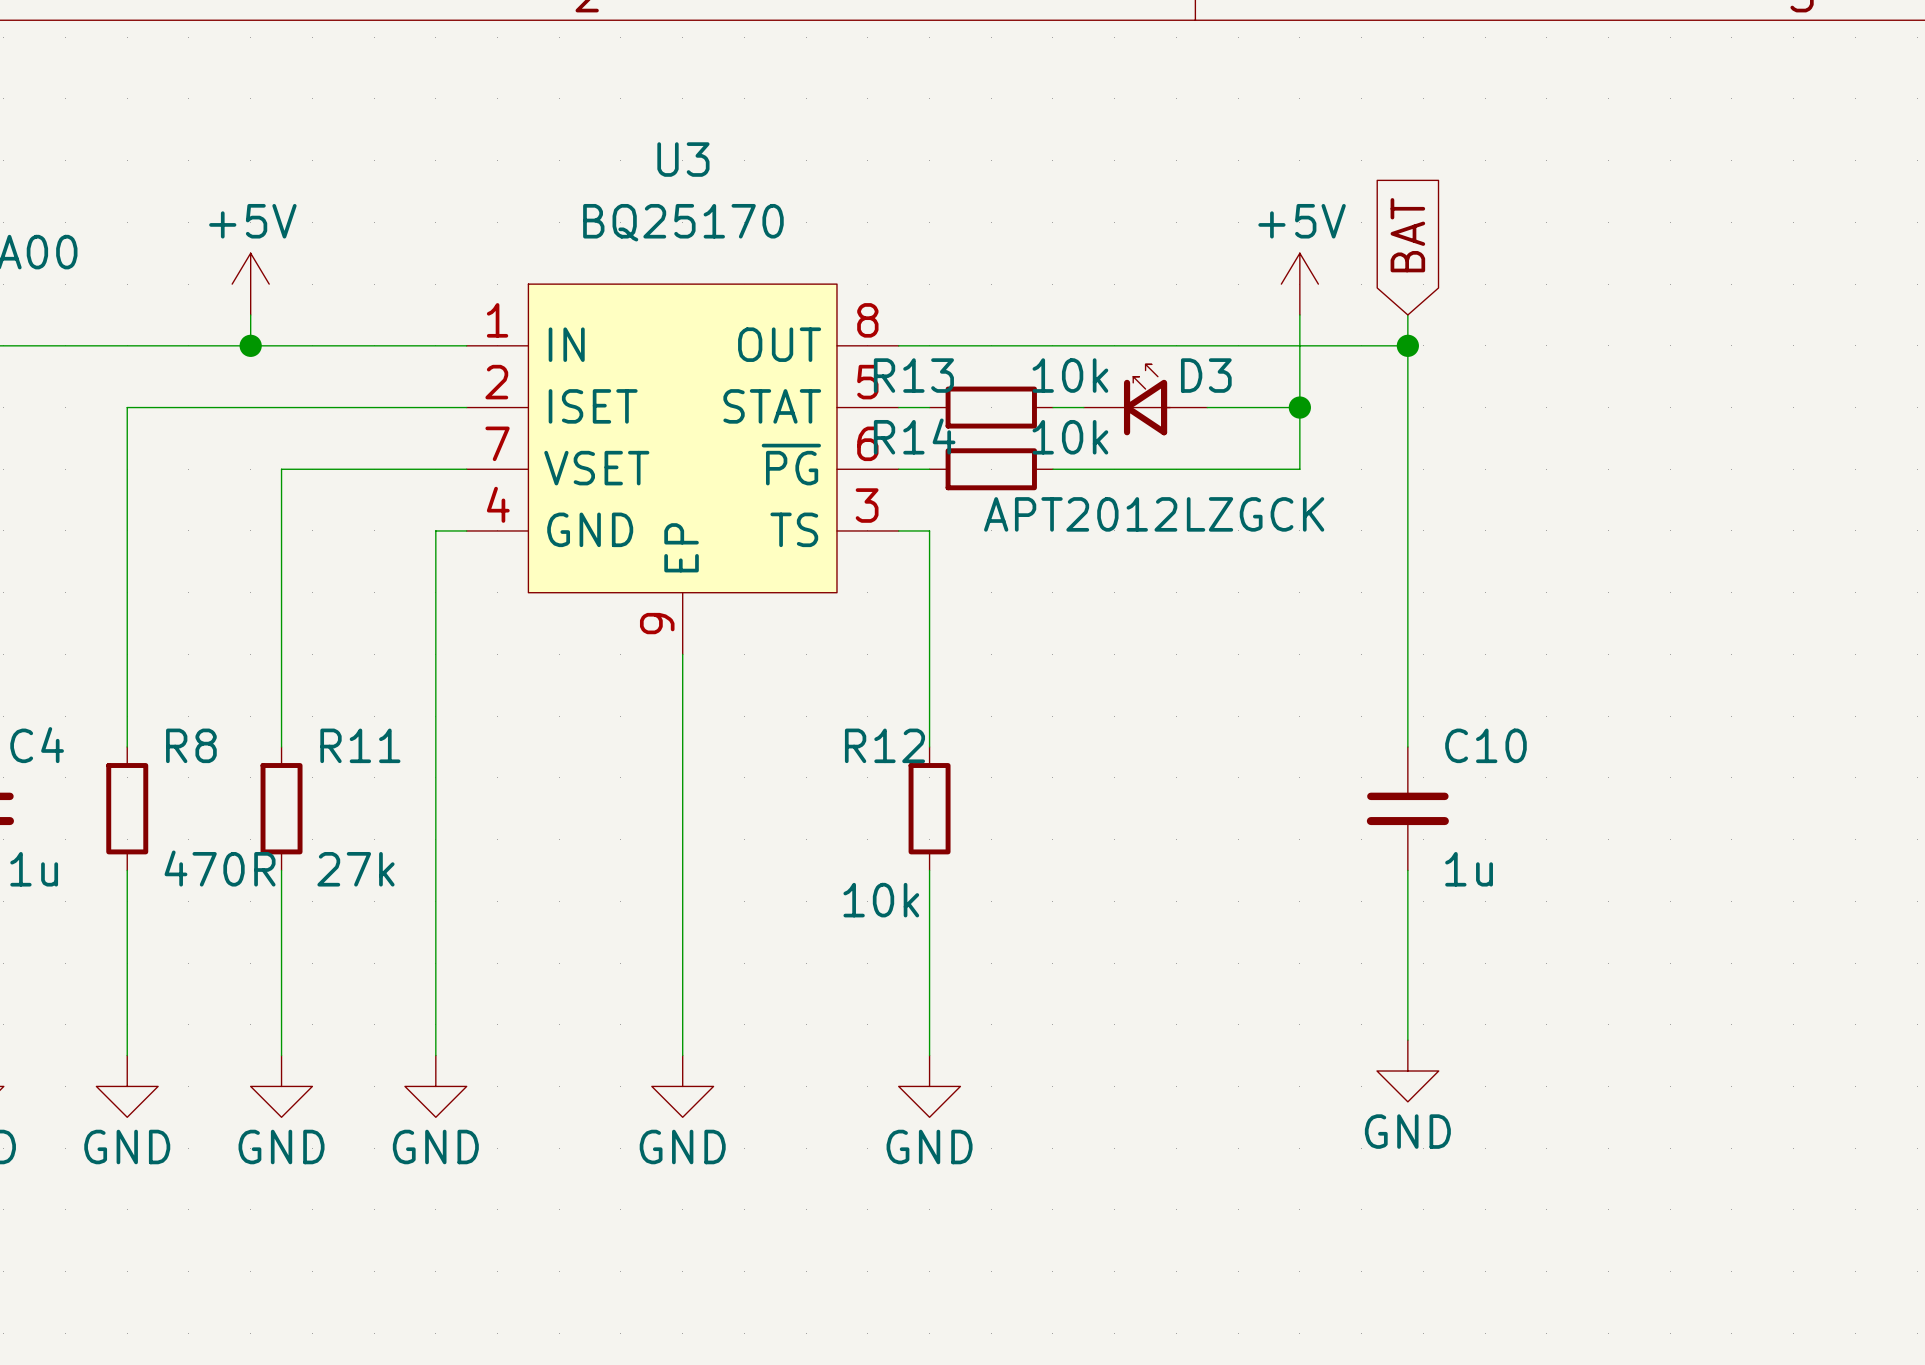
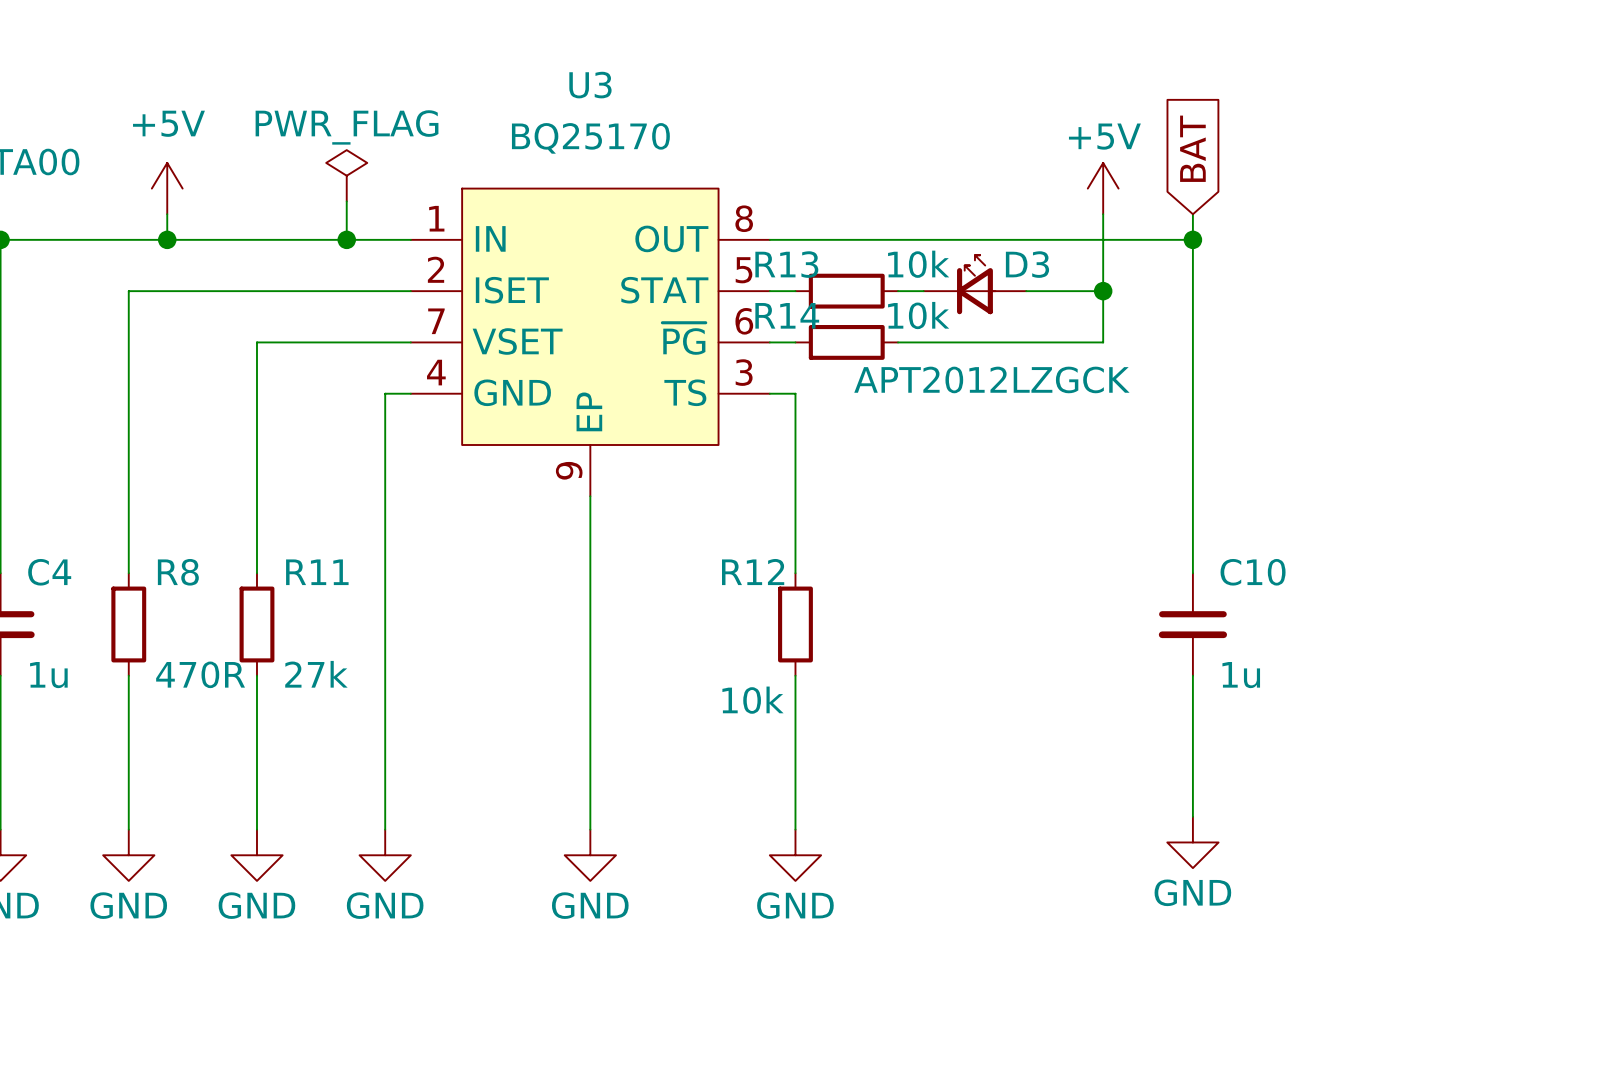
power symbol text position: +5V (252, 221) -> +5V (168, 123)
power symbol: none -> PWR_FLAG (346, 175)
power symbol position: +5V (250, 284) -> +5V (167, 188)
wire: none -> (346, 201) (346, 239)
wire: (250, 314) (250, 345) -> (167, 214) (167, 239)
junction: none -> (167, 239)
junction: (250, 345) -> none
junction: none -> (346, 239)

